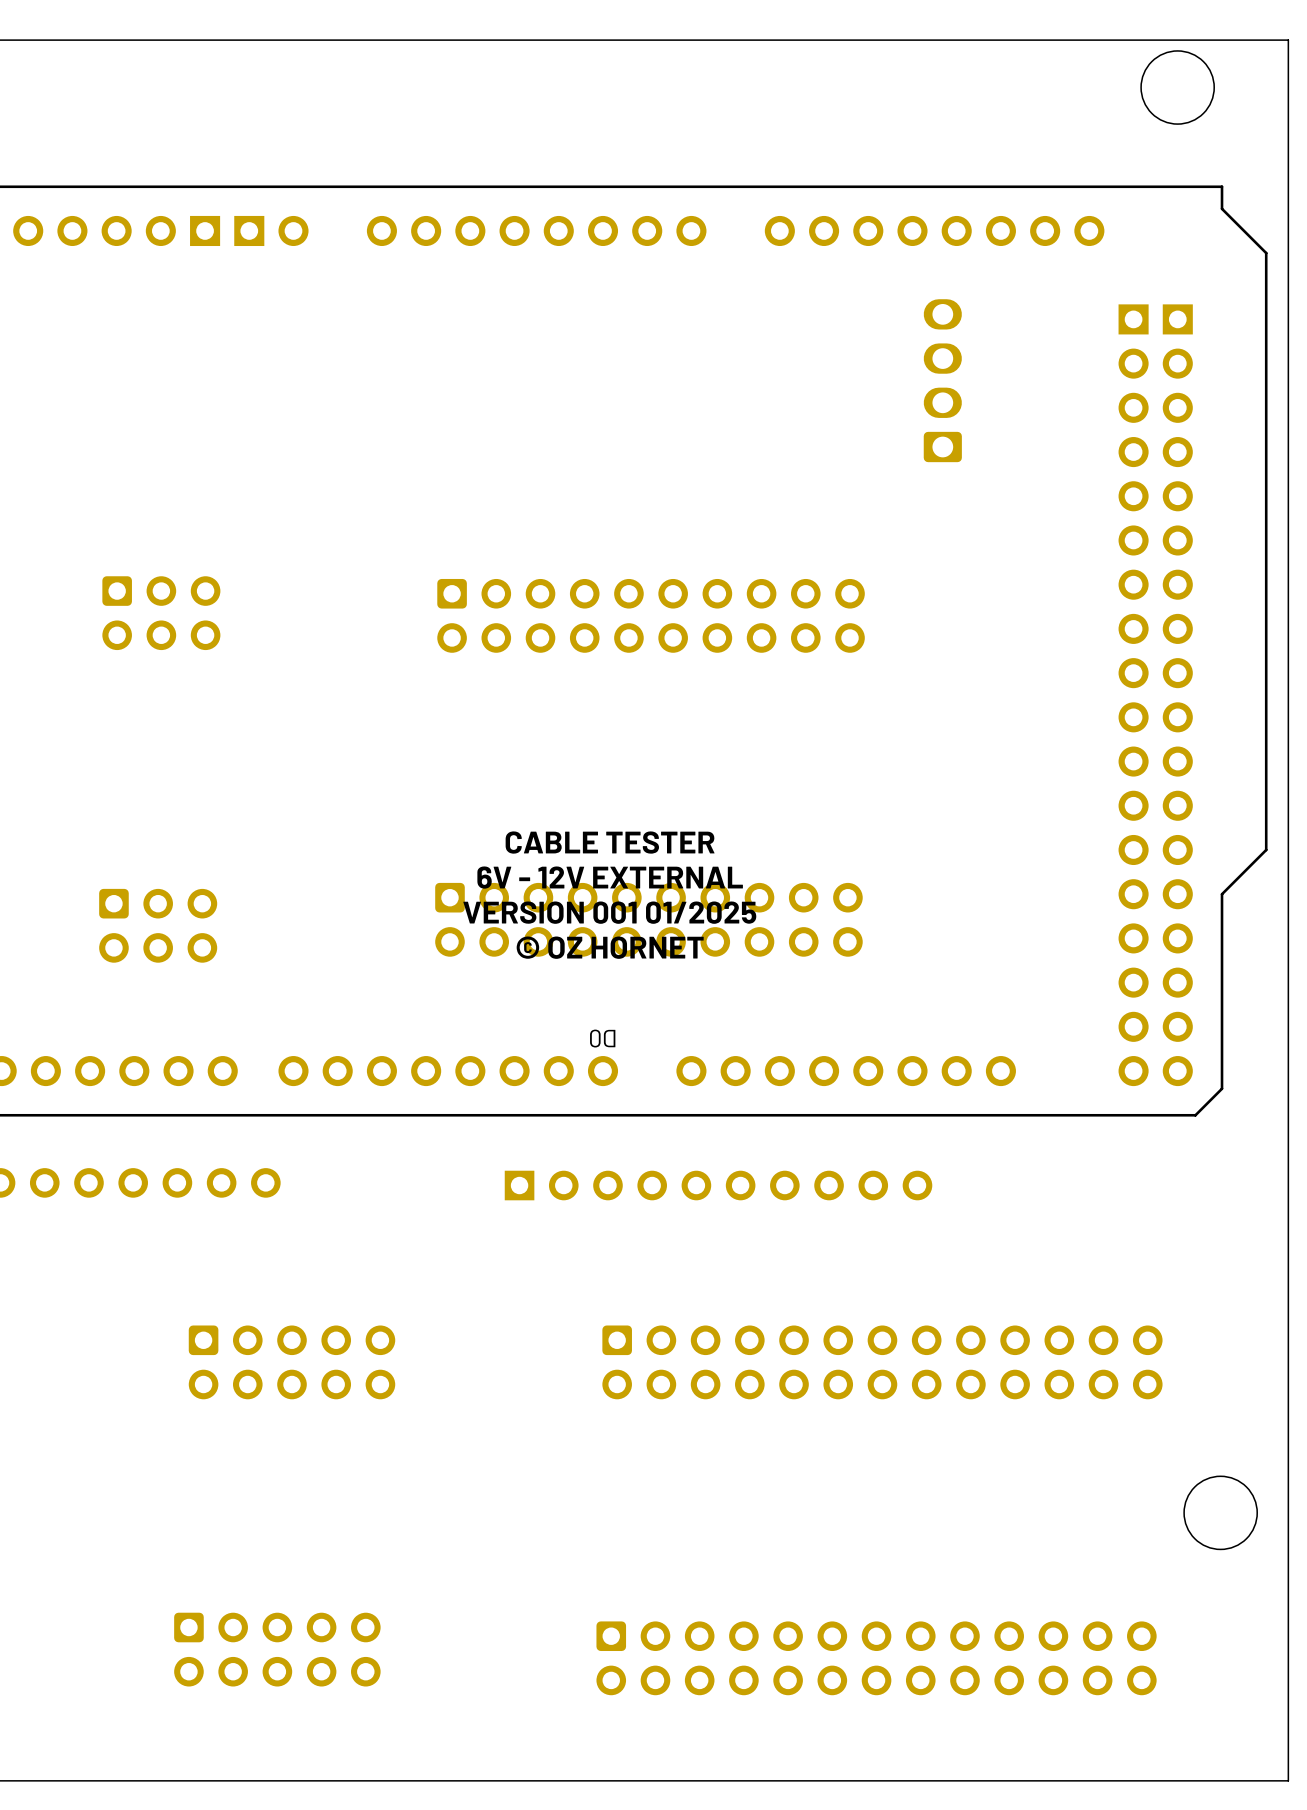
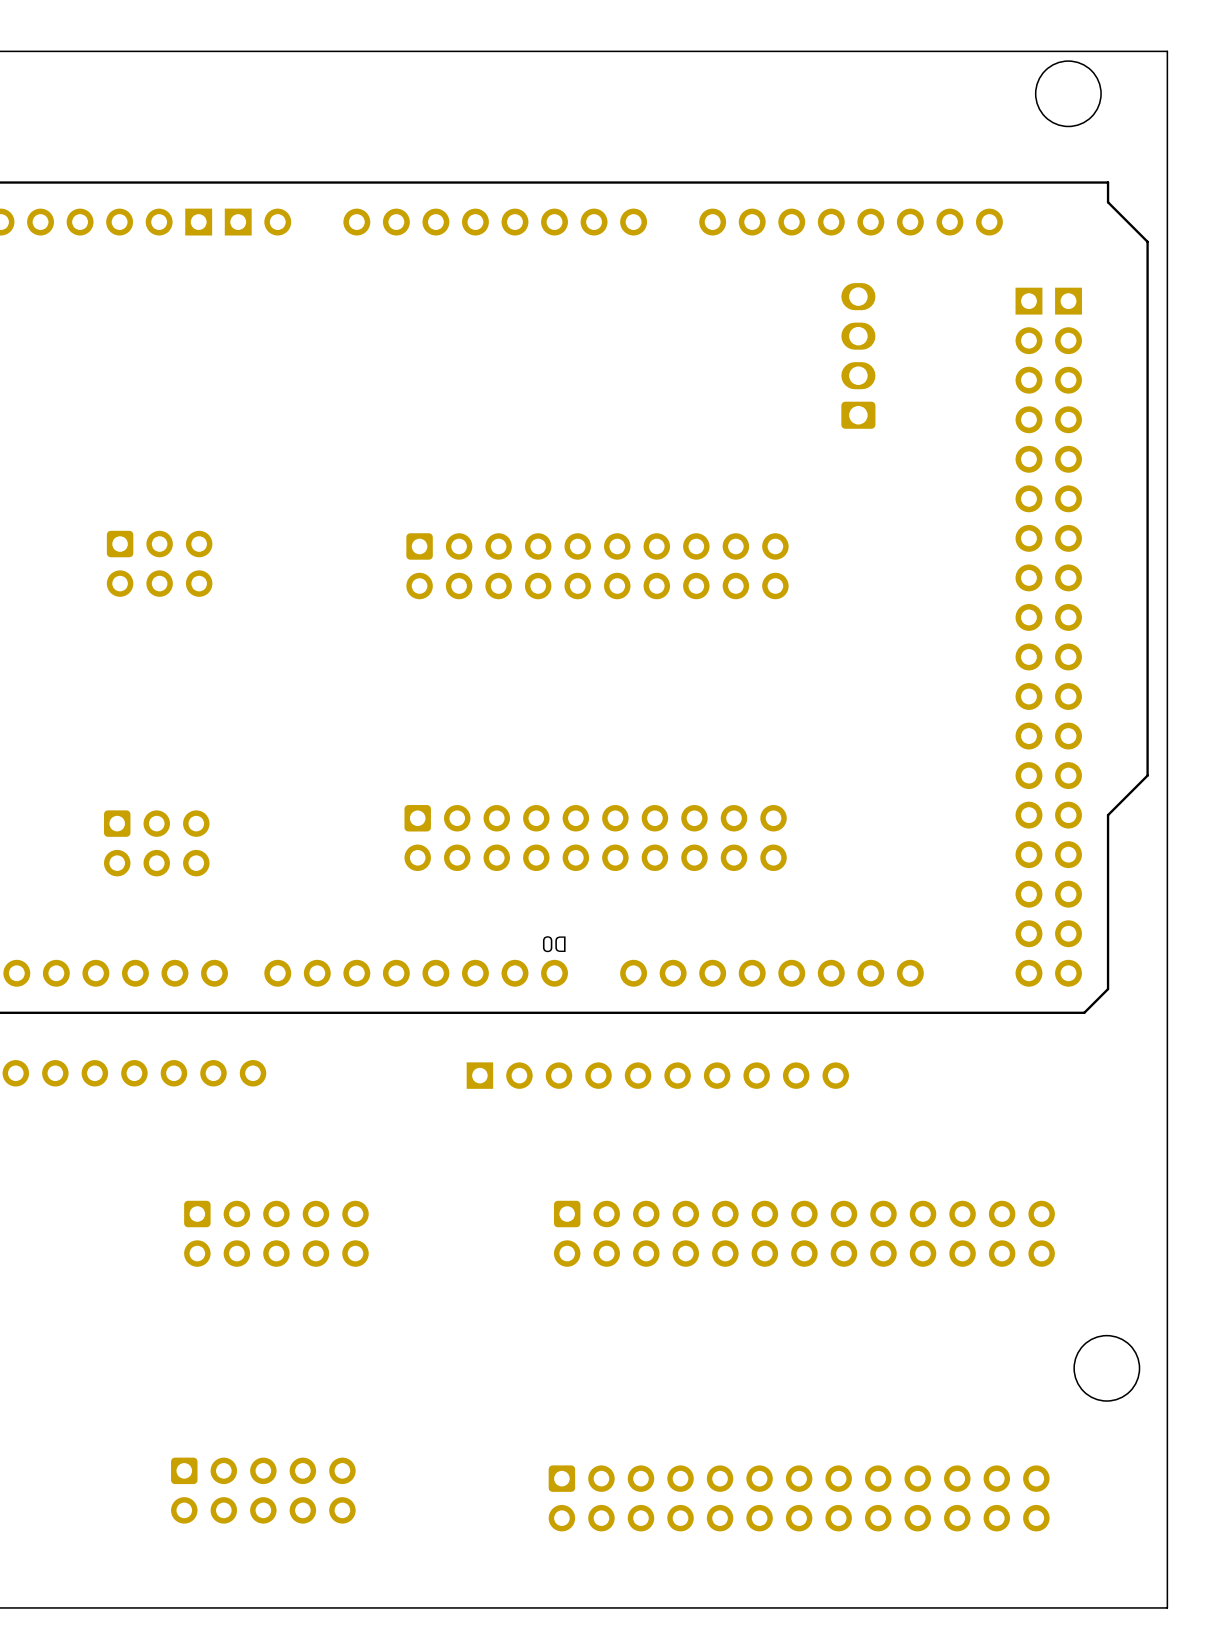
text: CABLE TESTER (610, 842) -> none
text: 6V - 12V EXTERNAL (610, 877) -> none
text: VERSION 001 01/2025 (609, 912) -> none
text: © OZ HORNET (610, 947) -> none

